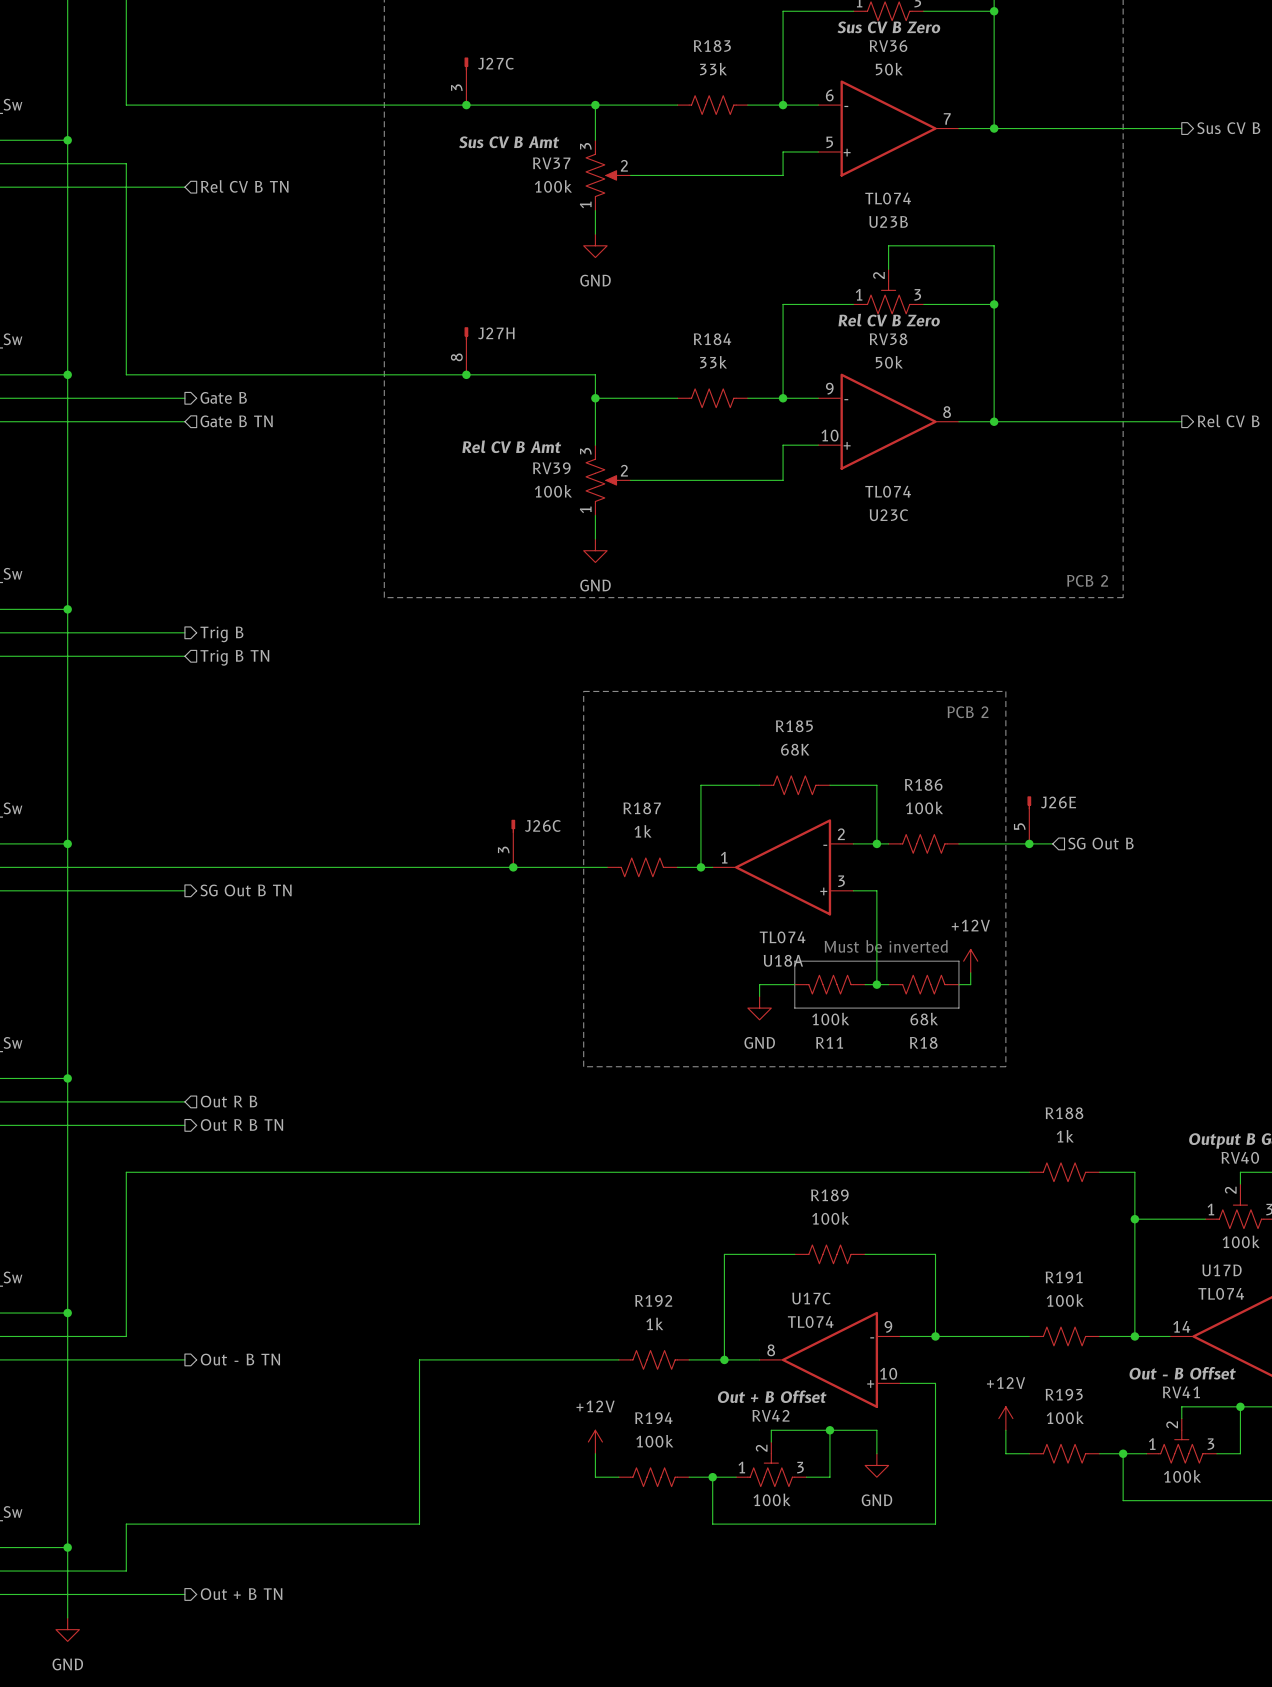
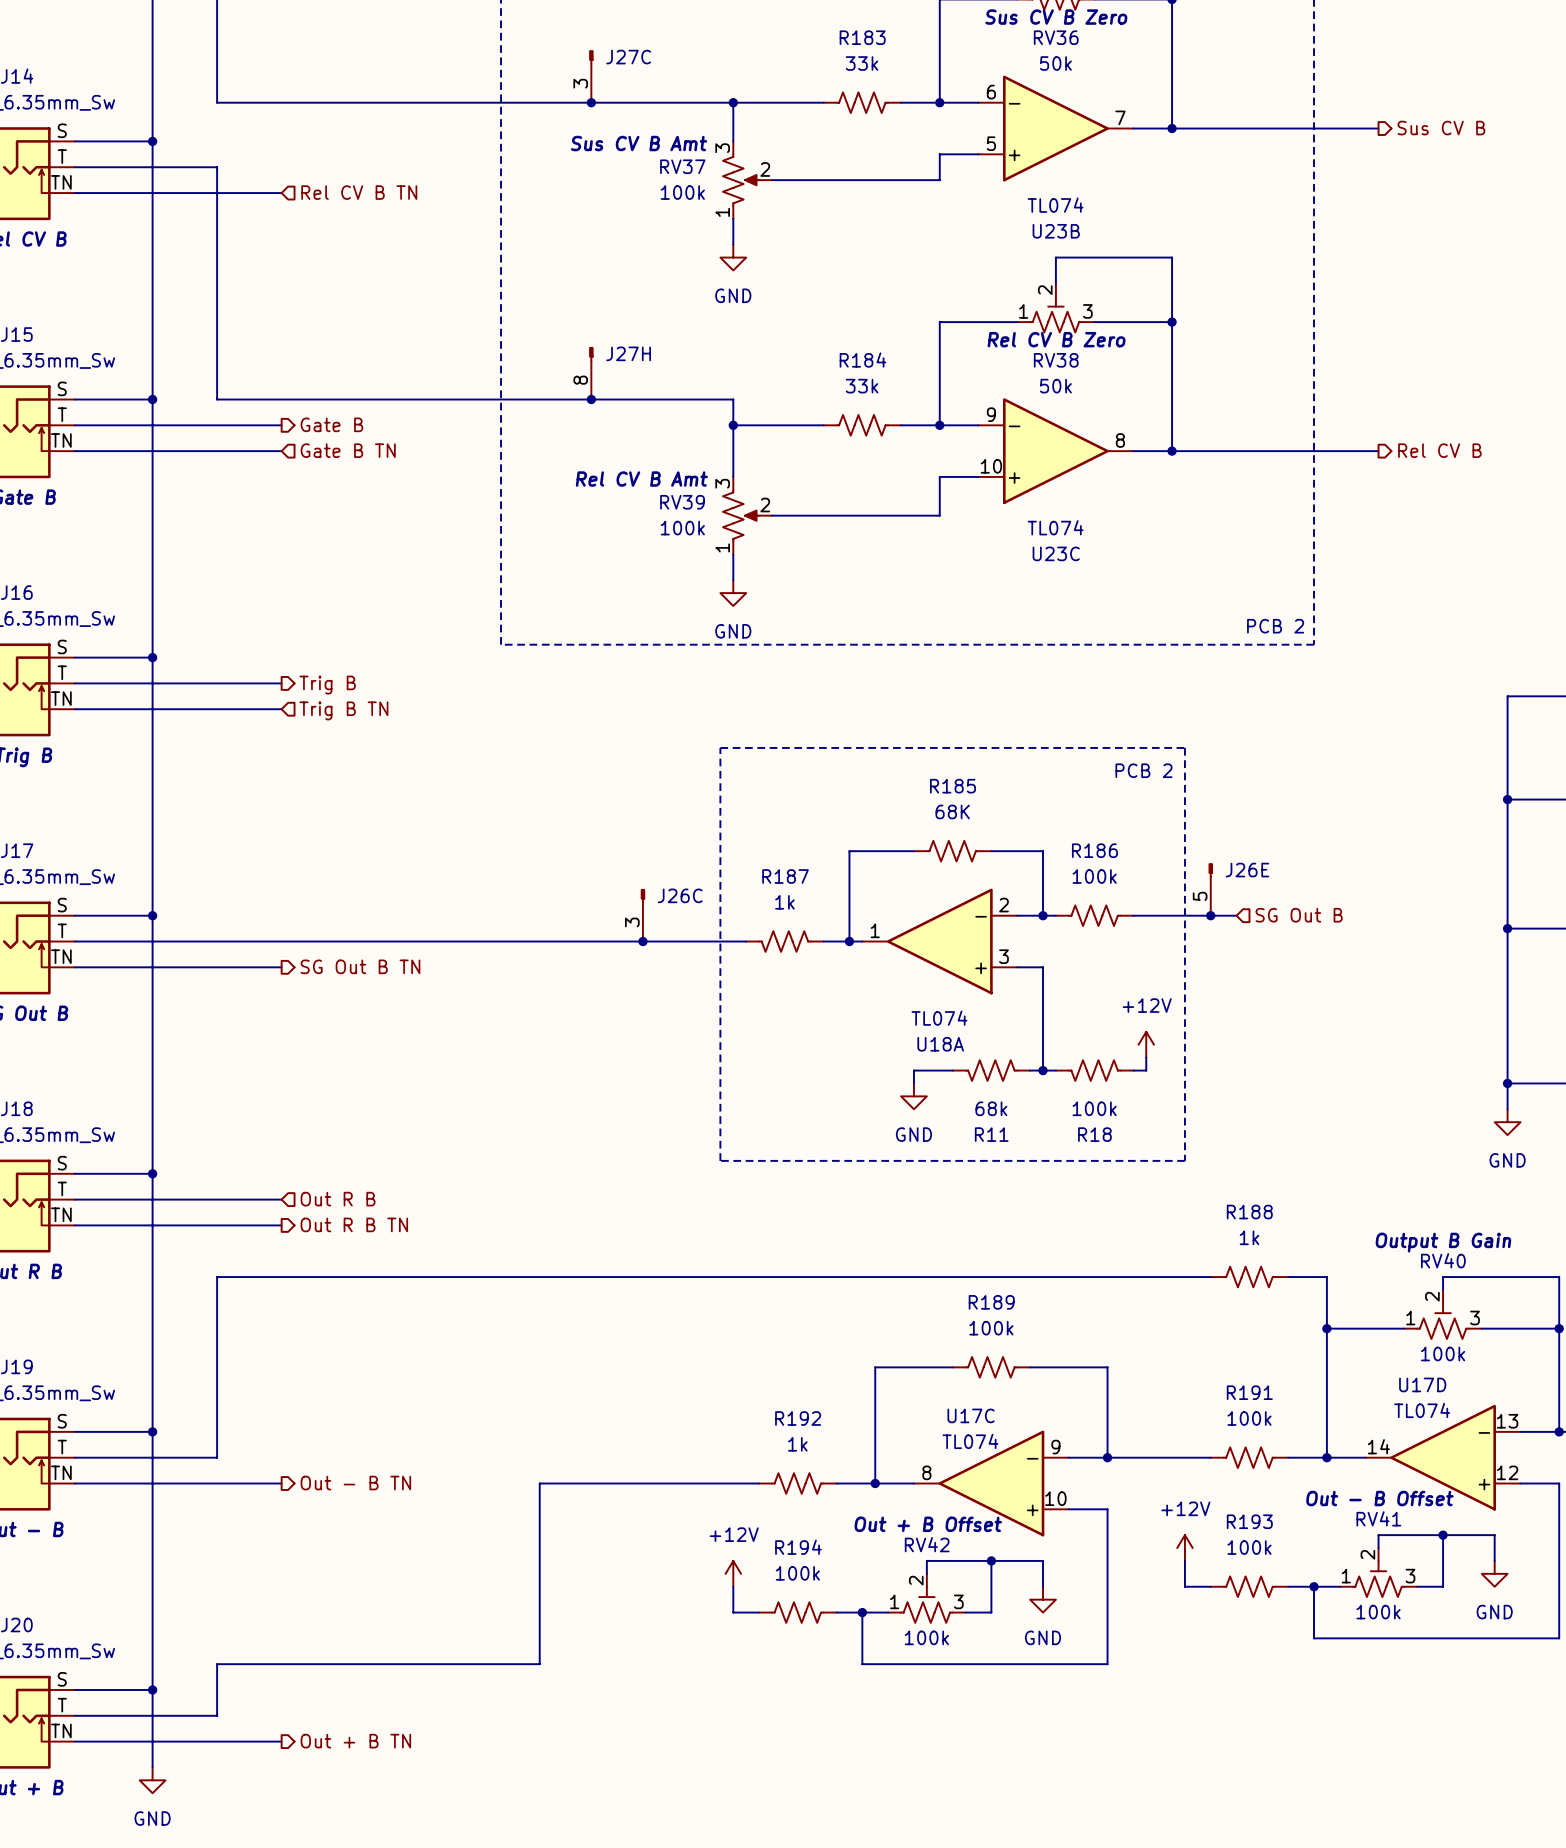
text: Must be inverted (886, 946) -> none
line: (794, 961) (958, 961) (958, 1008) (794, 1008) (794, 961) -> none
R11 value: 100k (830, 1019) -> 68k (991, 1108)
R18 value: 68k (924, 1019) -> 100k (1094, 1108)

